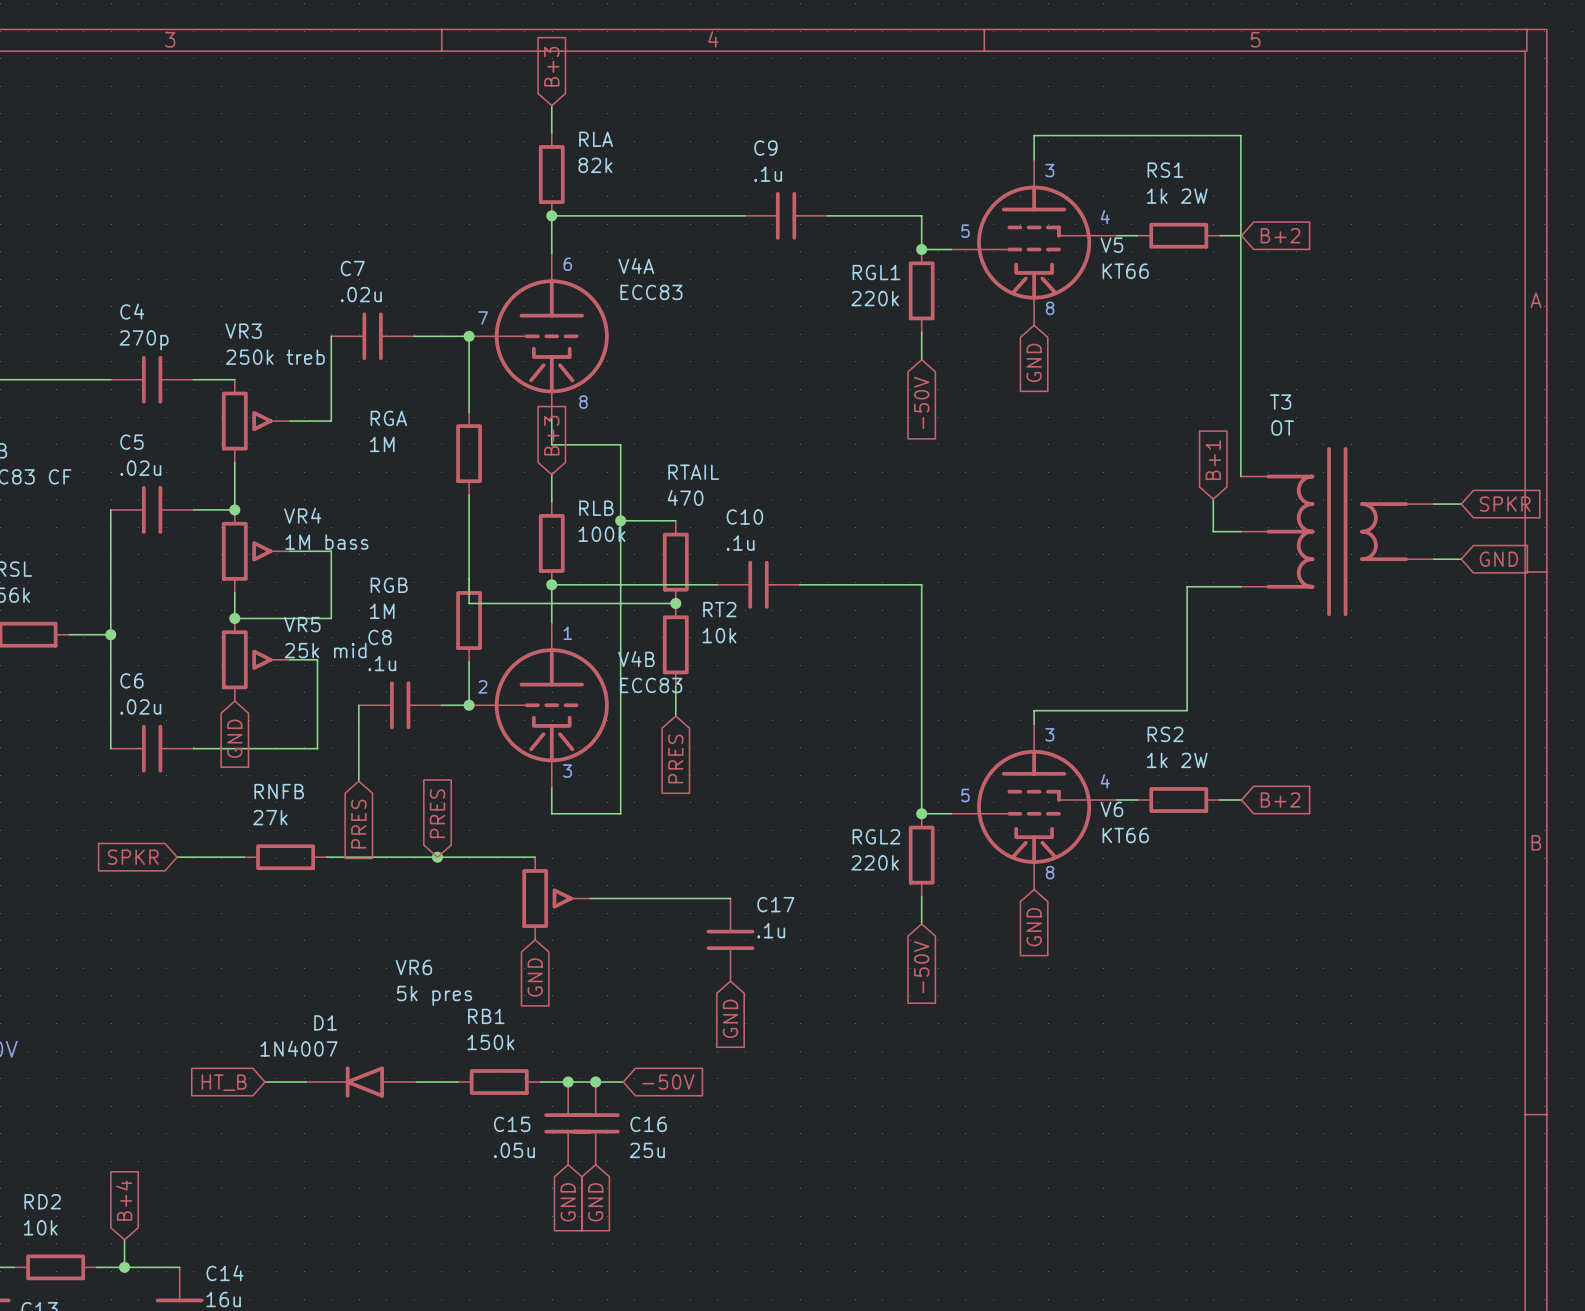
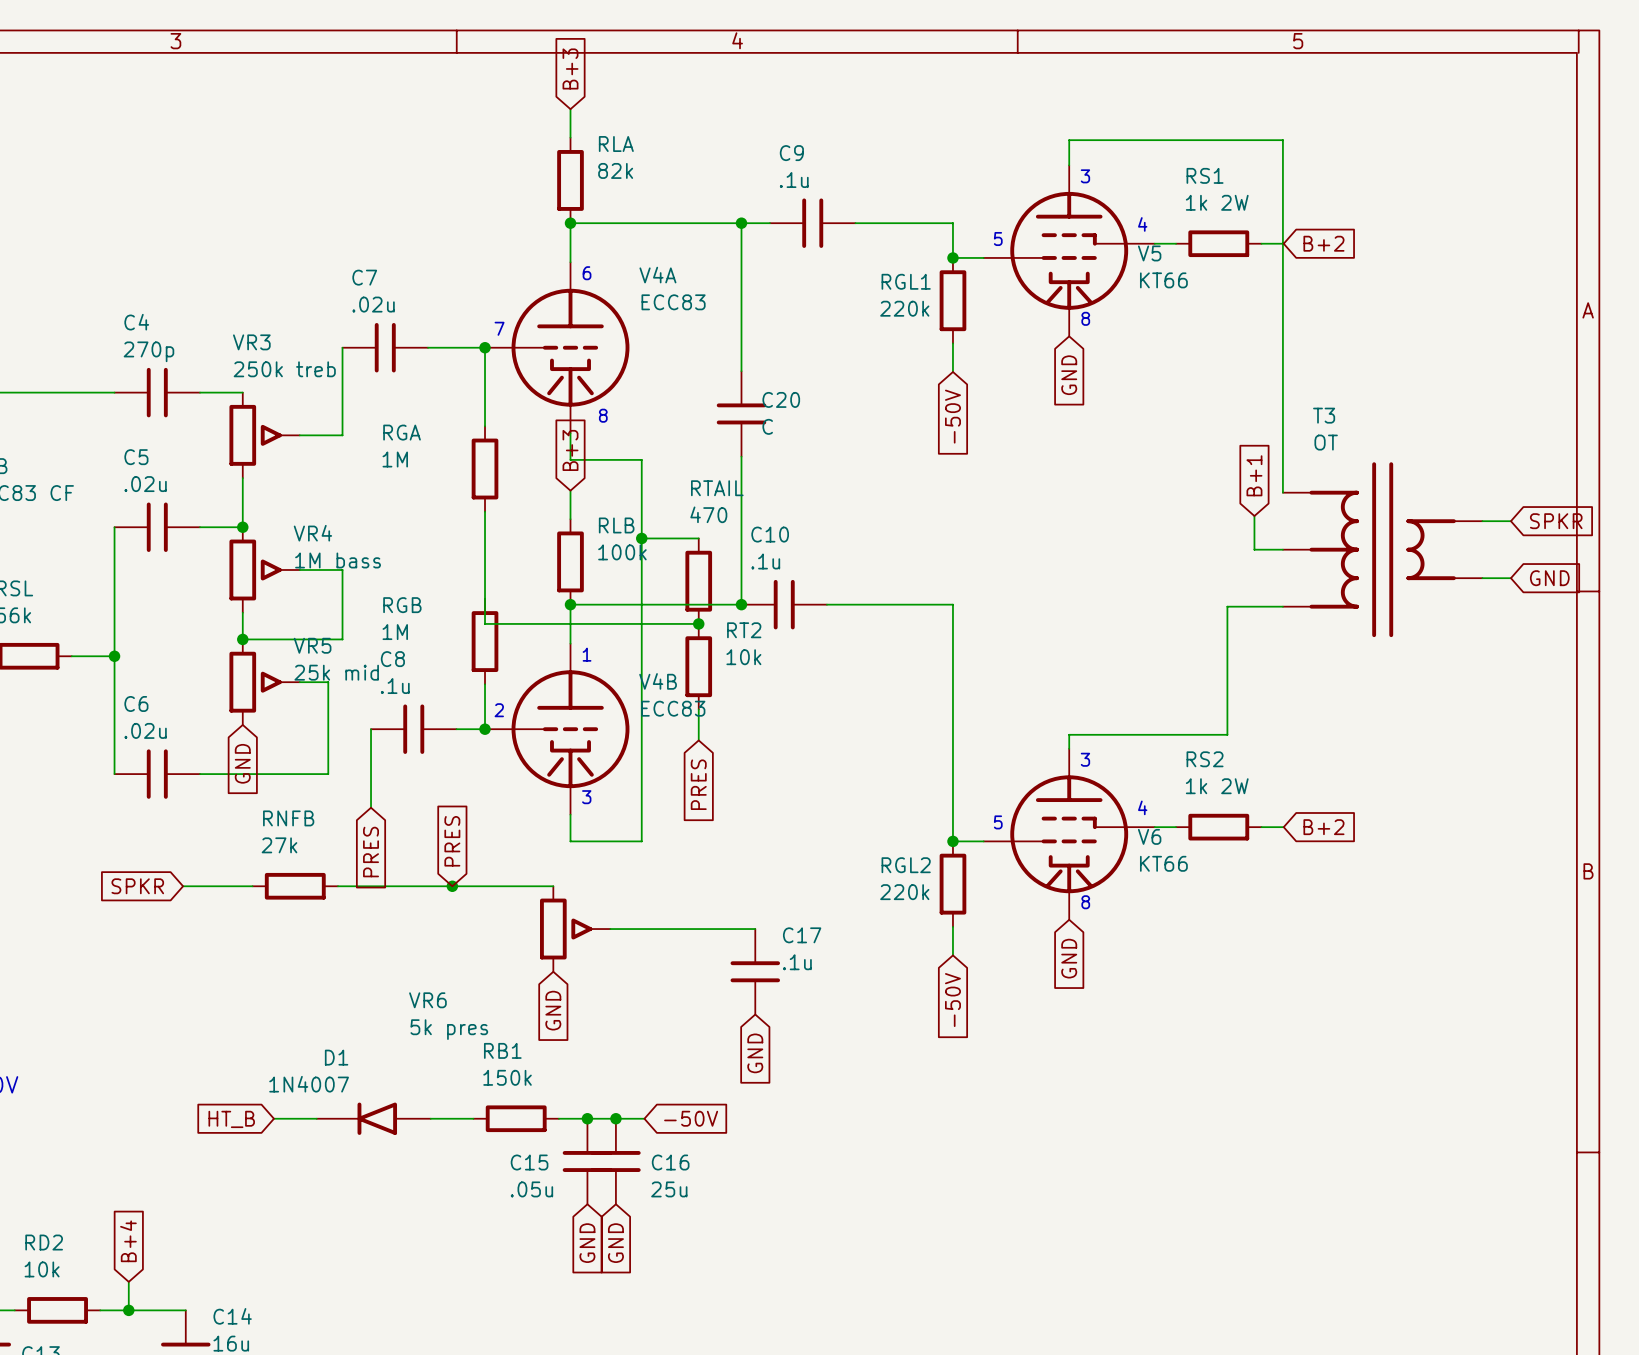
wire: none -> (741, 223) (741, 371)
junction: none -> (741, 223)
C20: none -> C (741, 413)
wire: none -> (741, 456) (741, 604)
junction: none -> (741, 604)

